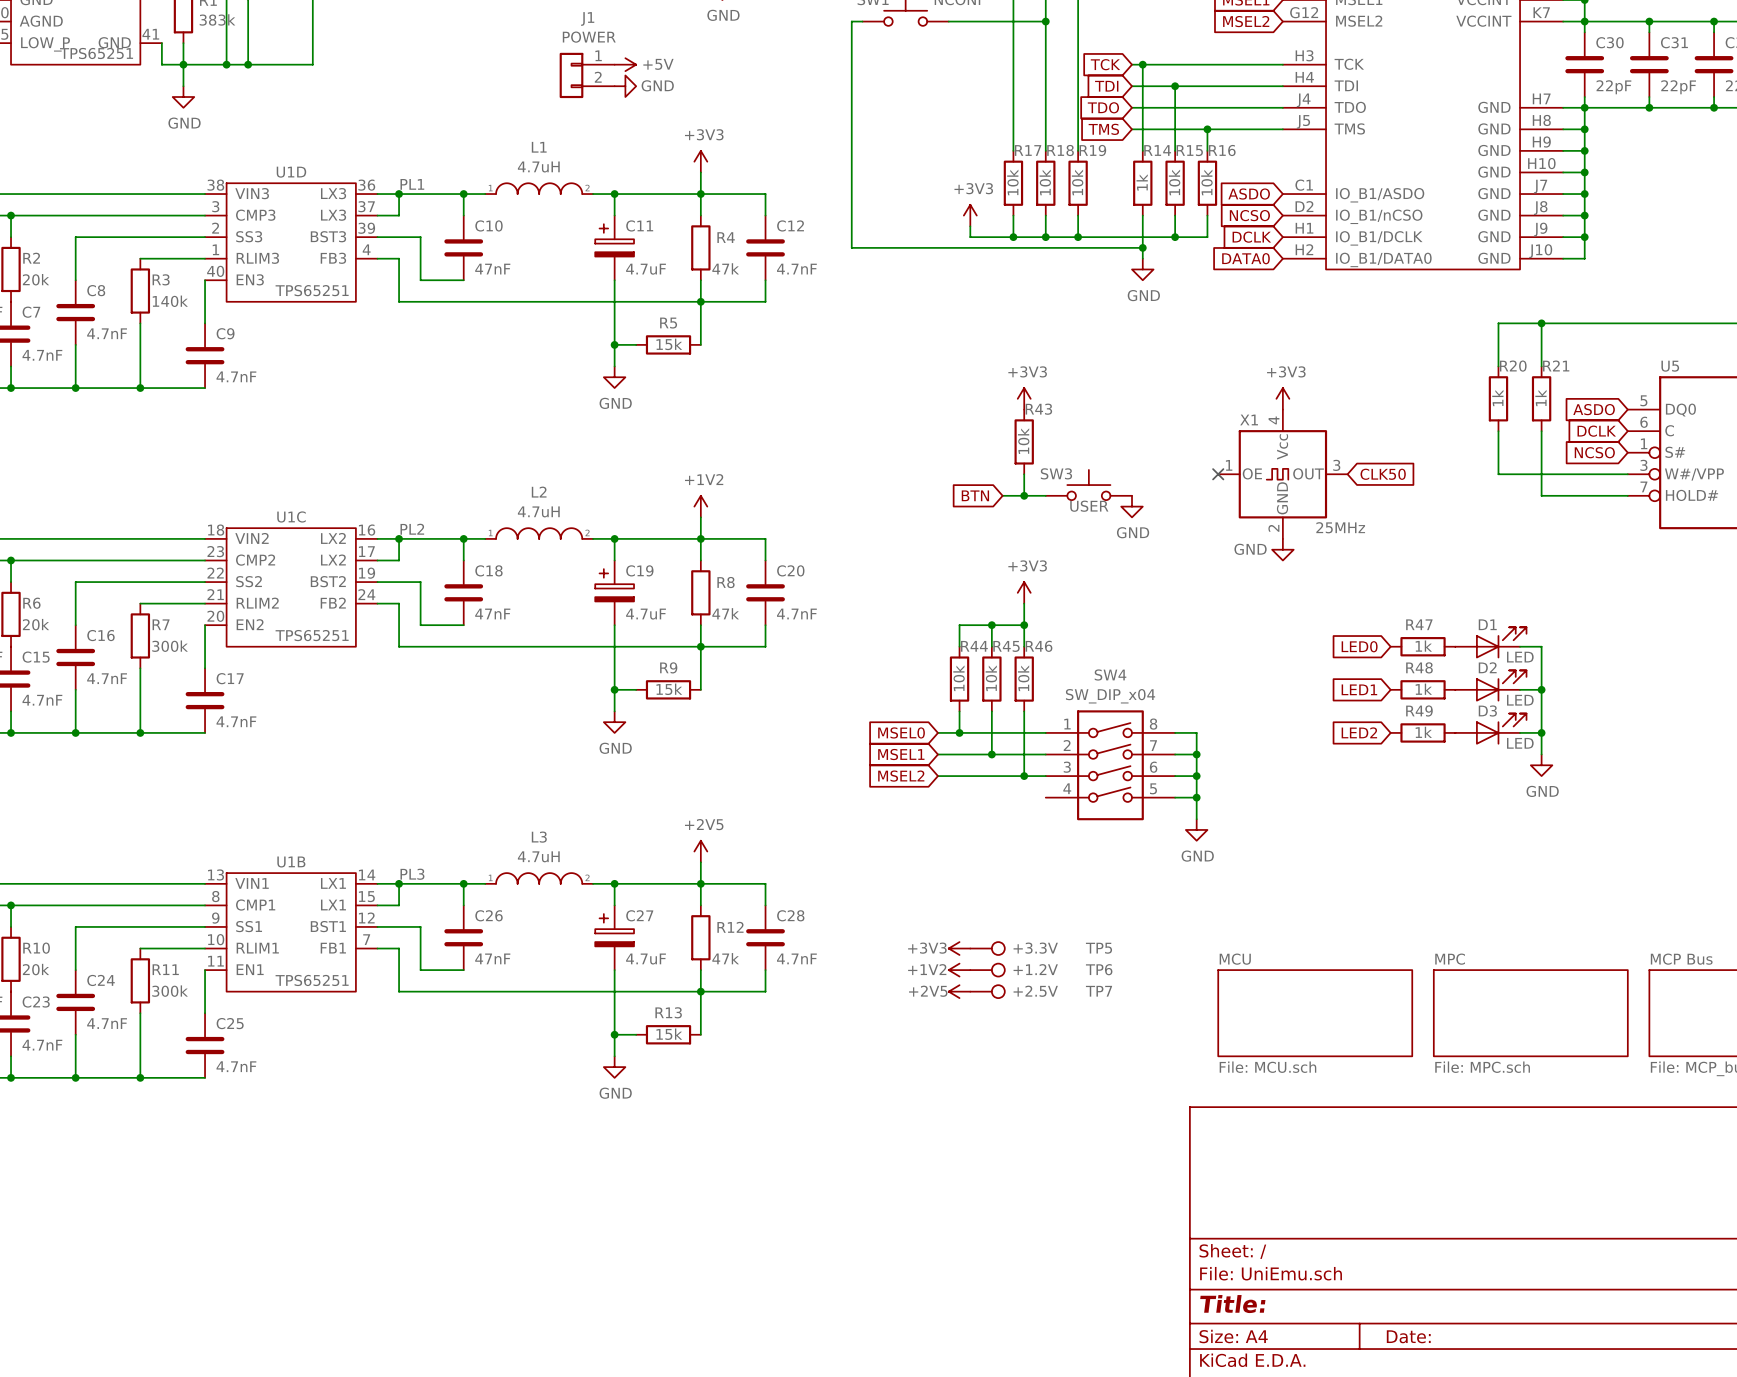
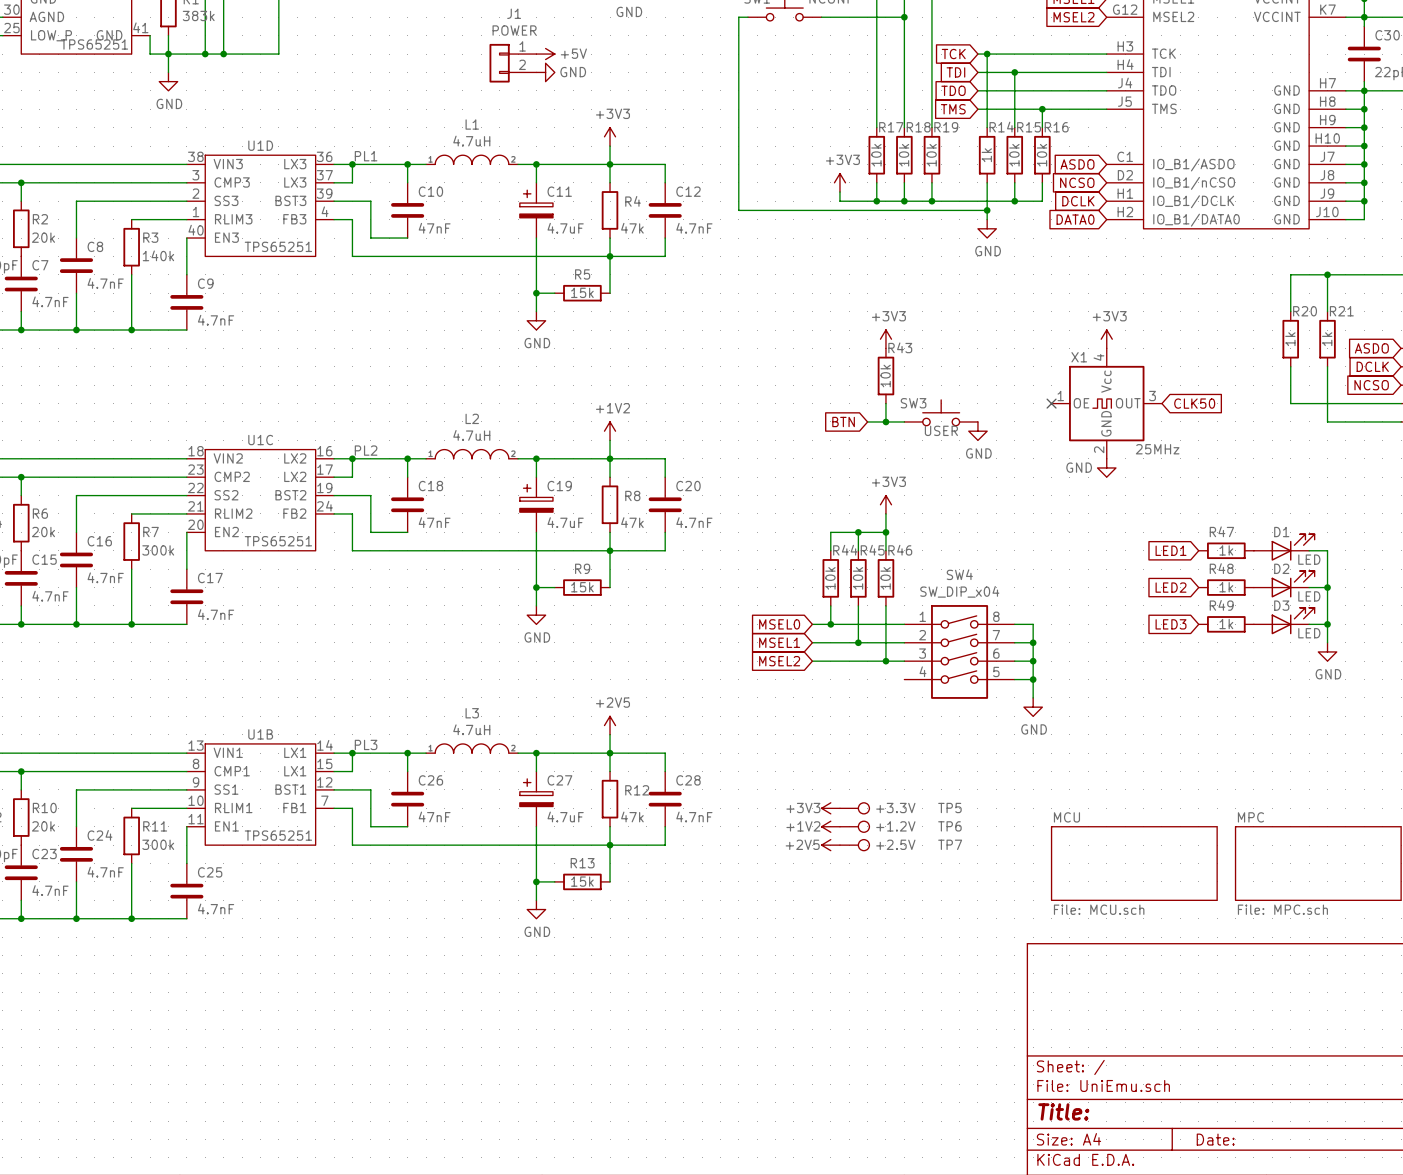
global label: LED0 (1359, 646) -> LED1 (1171, 550)
global label: LED1 (1359, 689) -> LED2 (1171, 587)
global label: LED2 (1359, 732) -> LED3 (1171, 624)

